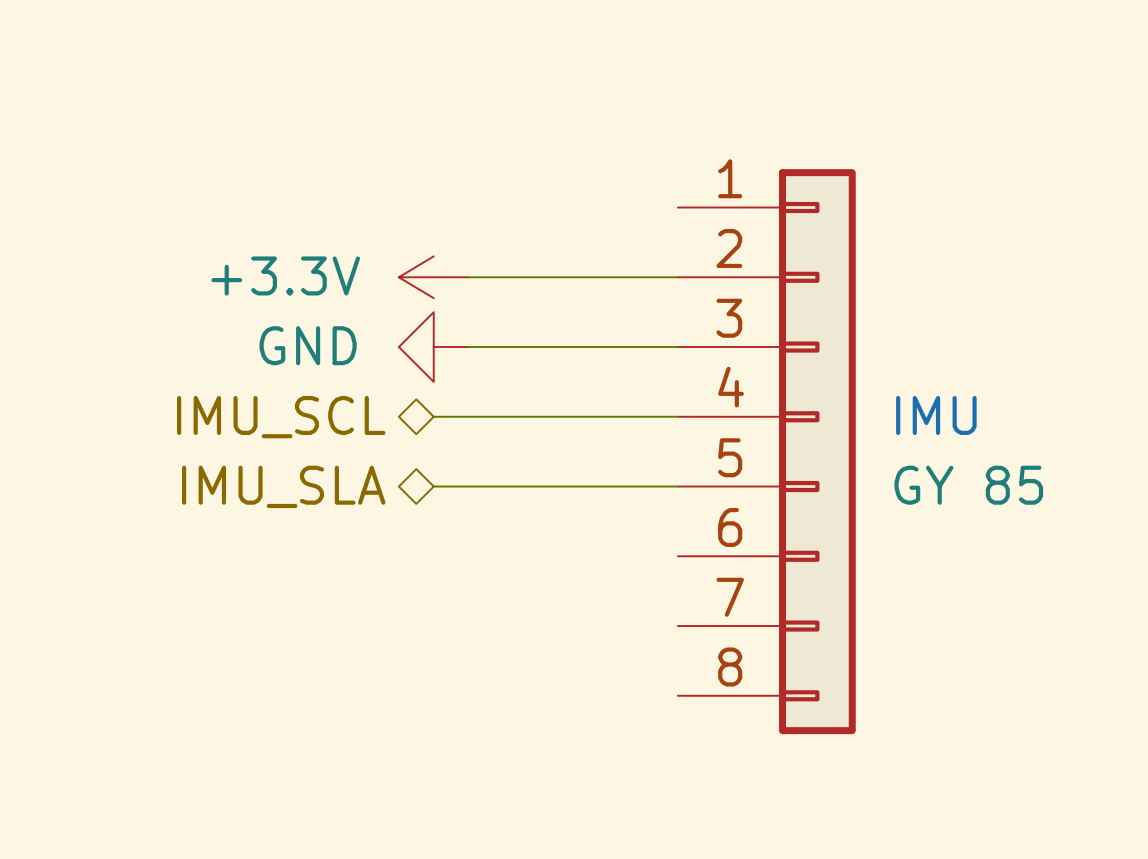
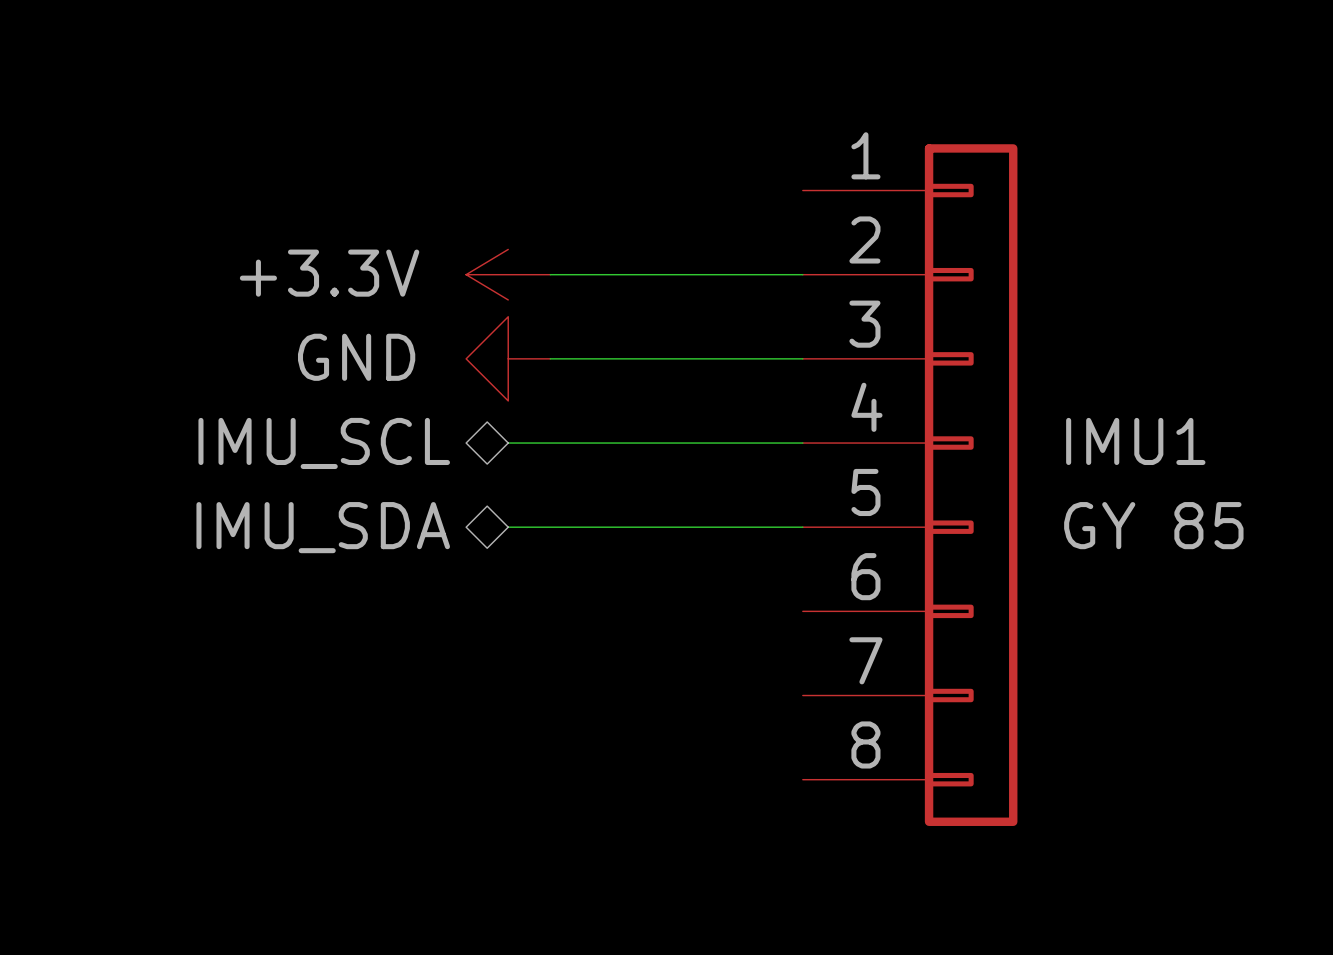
IMU name: IMU (936, 415) -> IMU1 (1135, 441)
hierarchical label: IMU_SLA (283, 486) -> IMU_SDA (323, 527)

